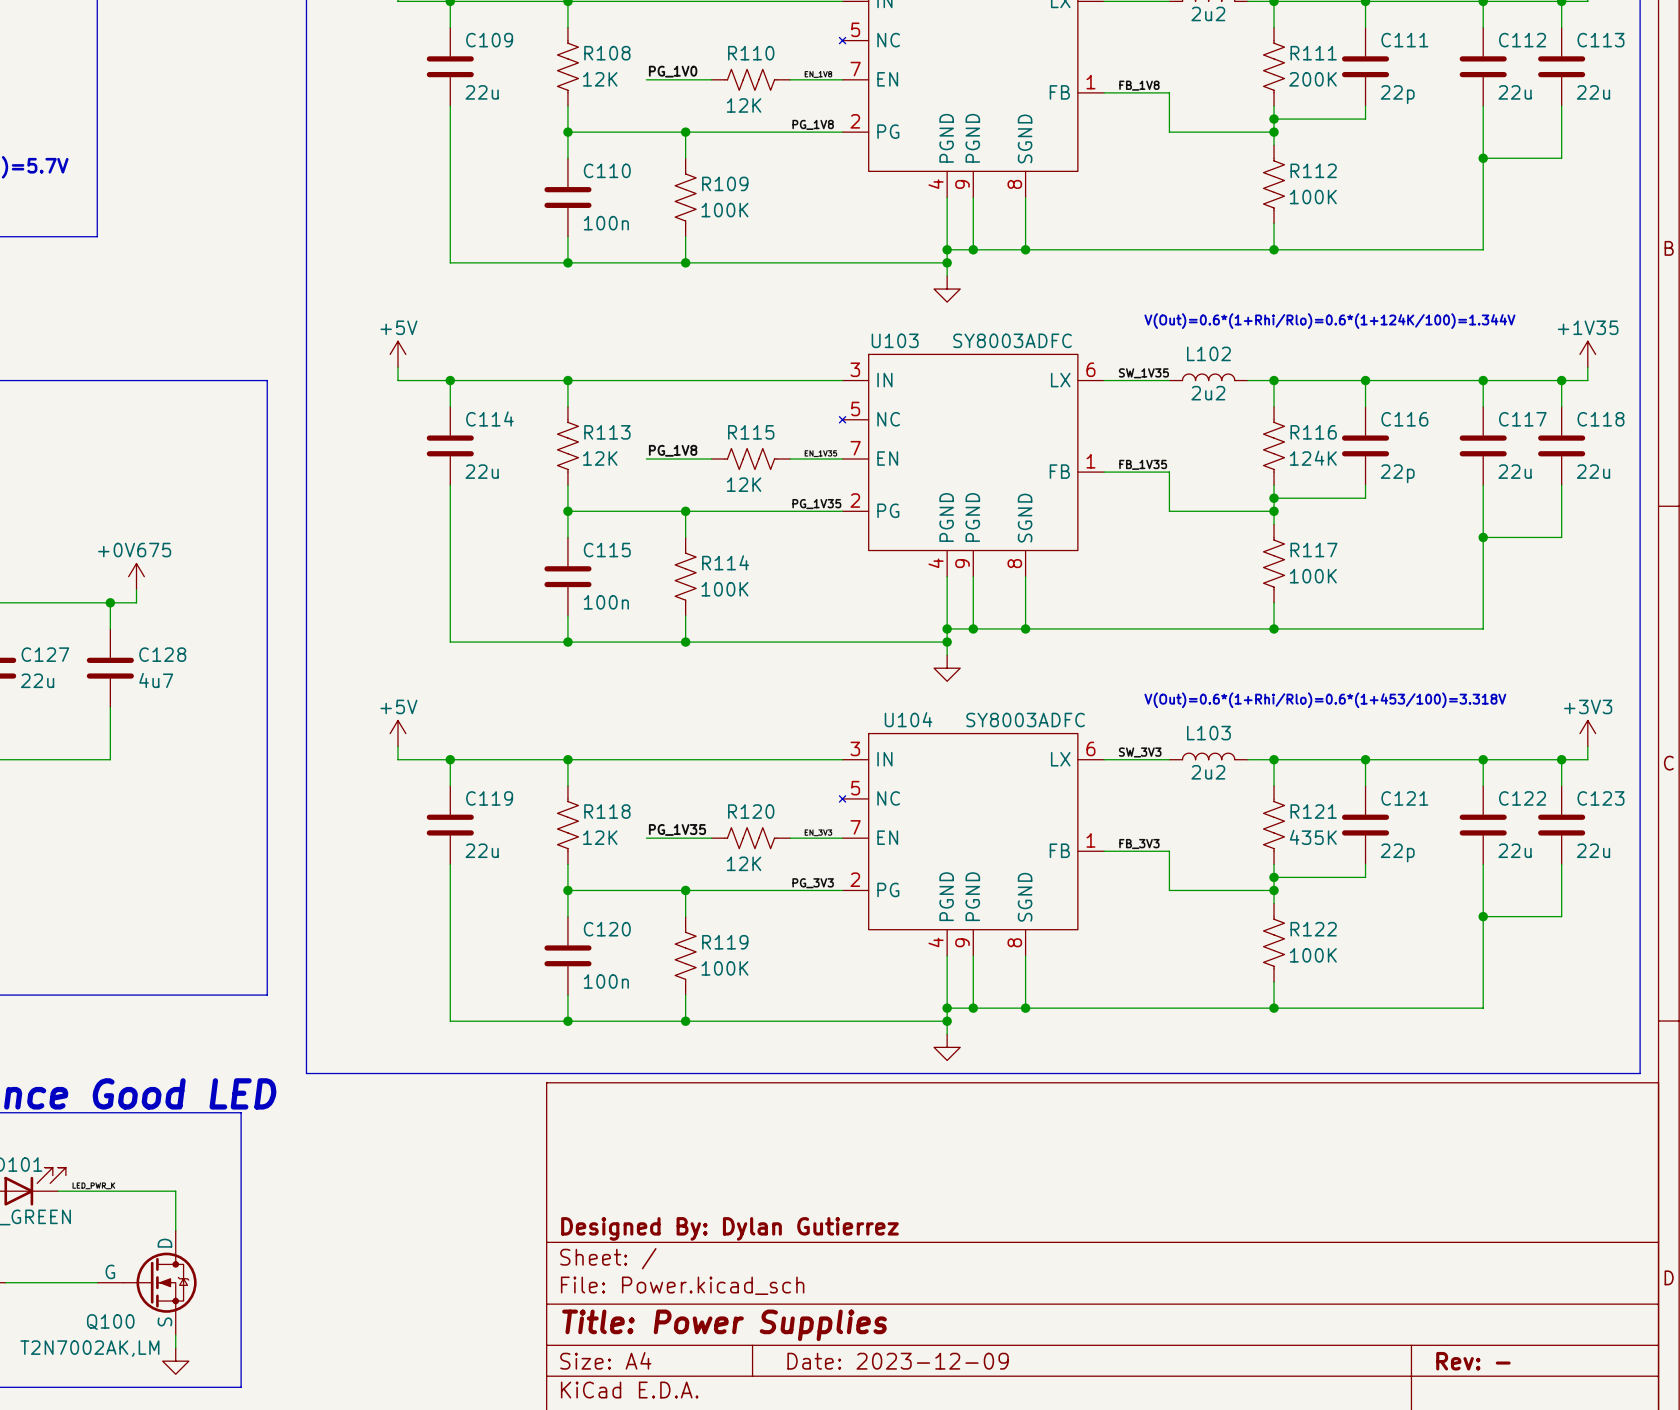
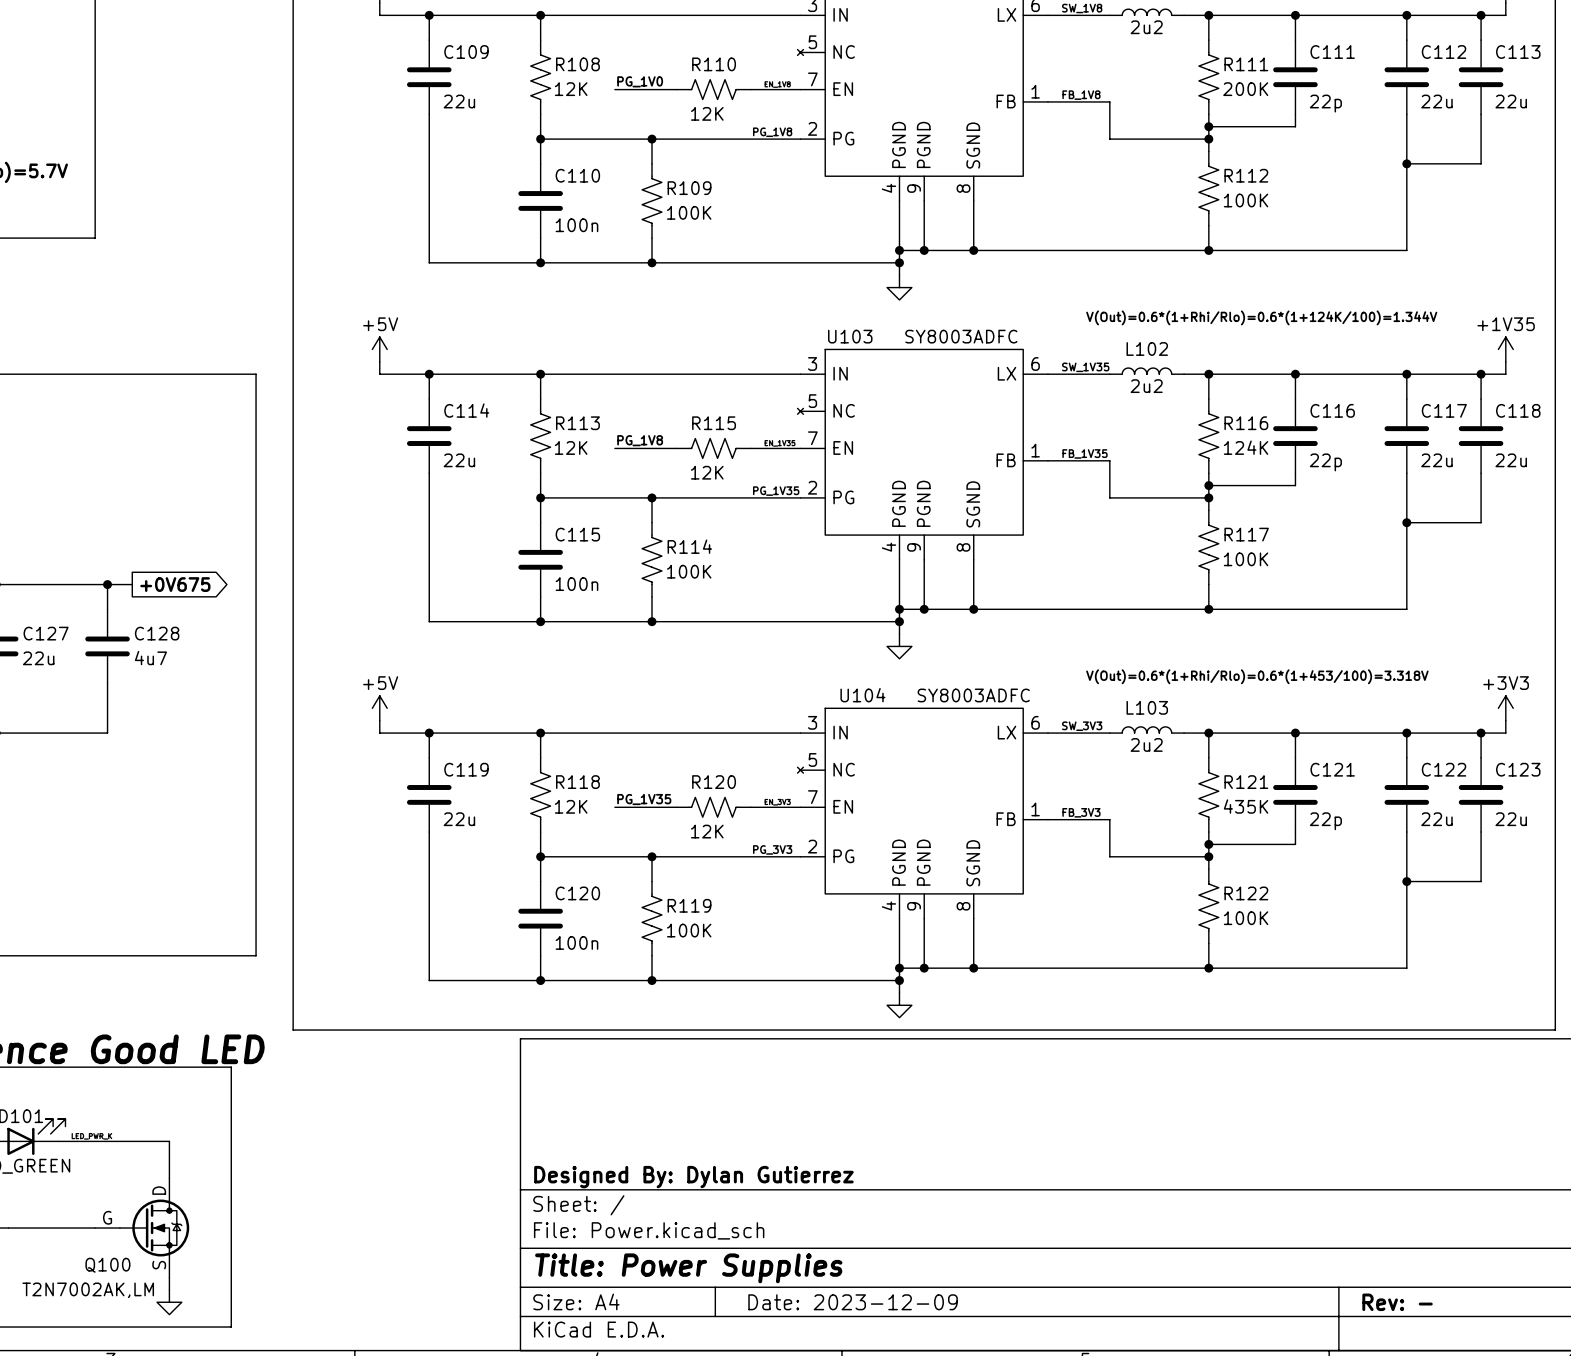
power symbol: +0V675 (136, 576) -> none
global label: none -> +0V675 (175, 584)

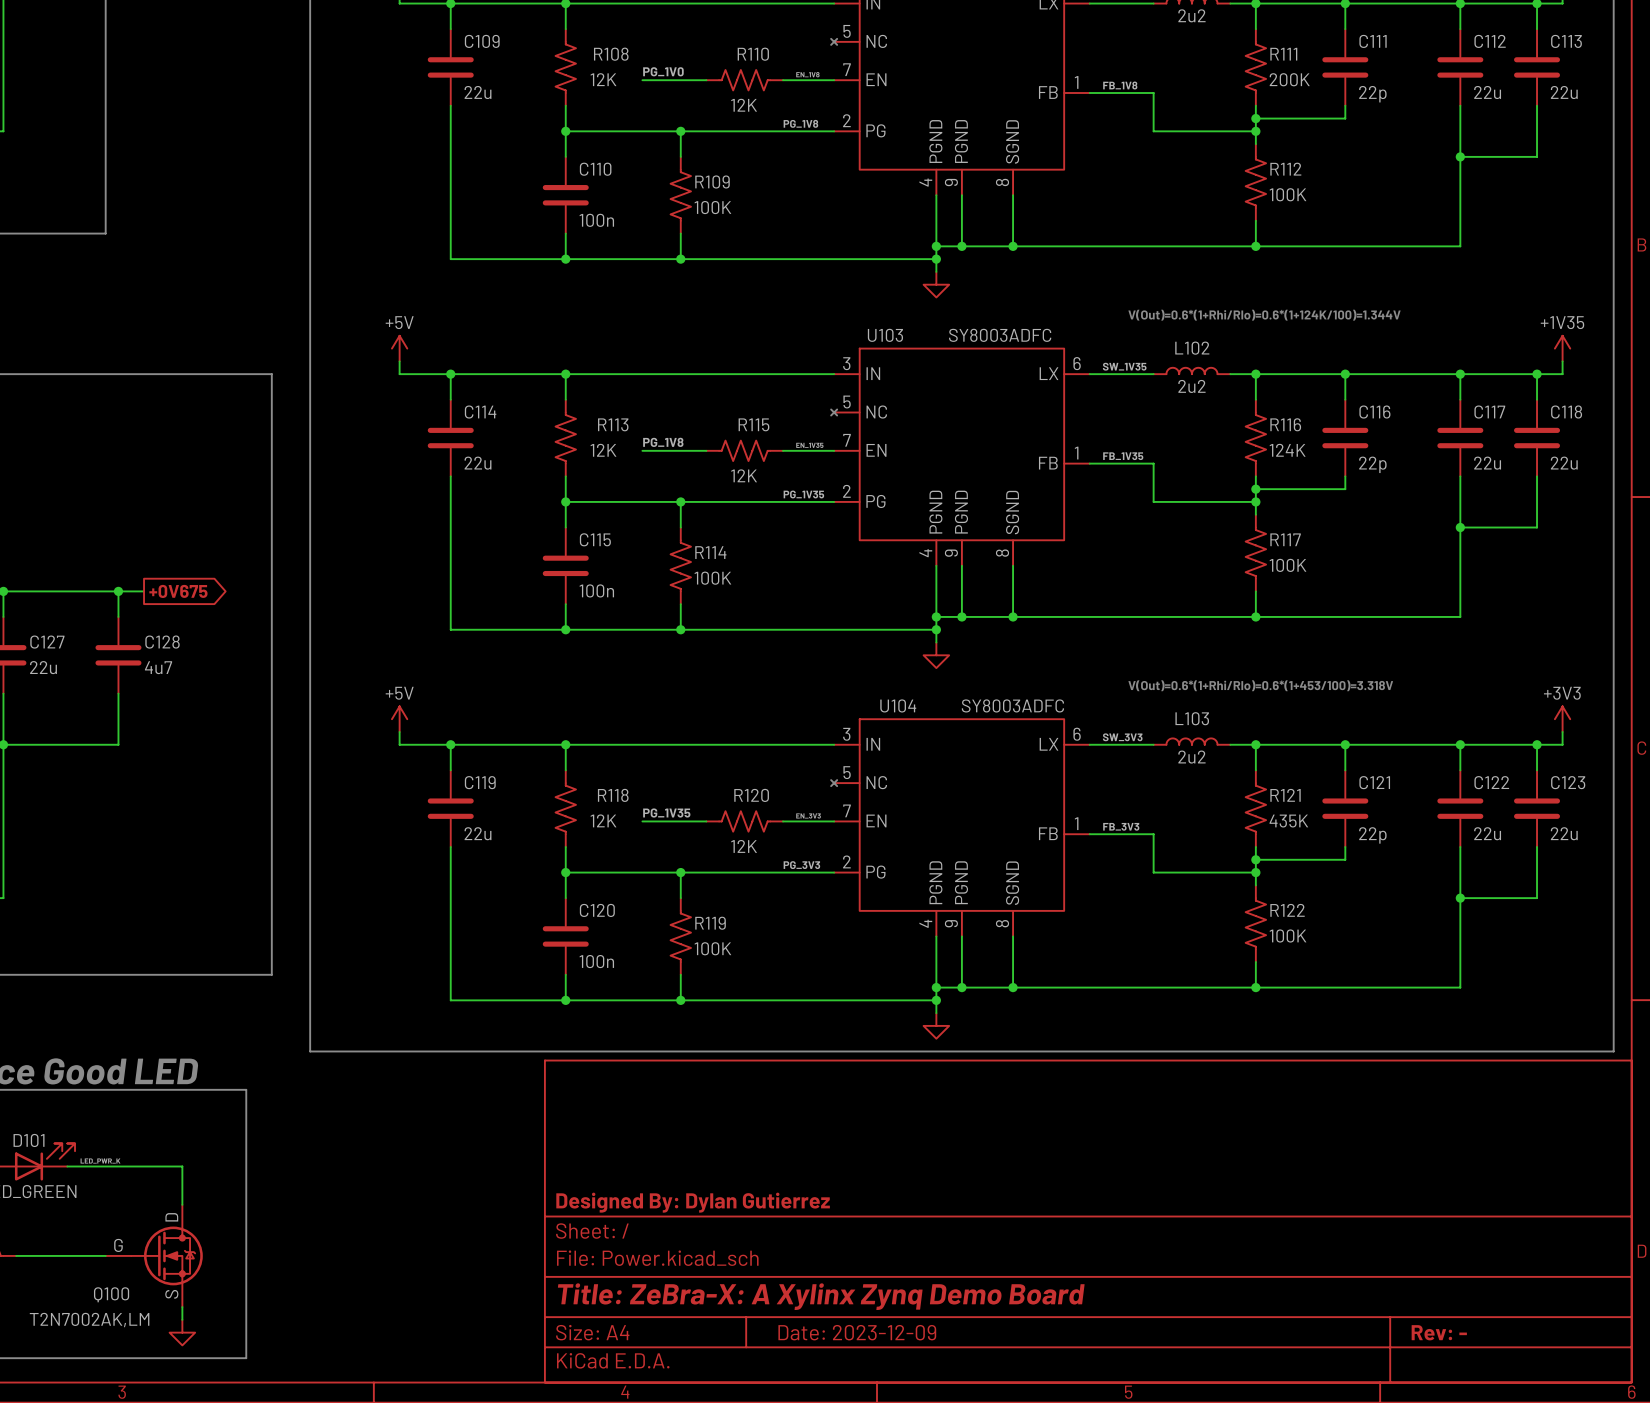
title block: Title: Power Supplies (688, 1268) -> Title: ZeBra-X: A Xylinx Zynq Demo Board (821, 1296)

